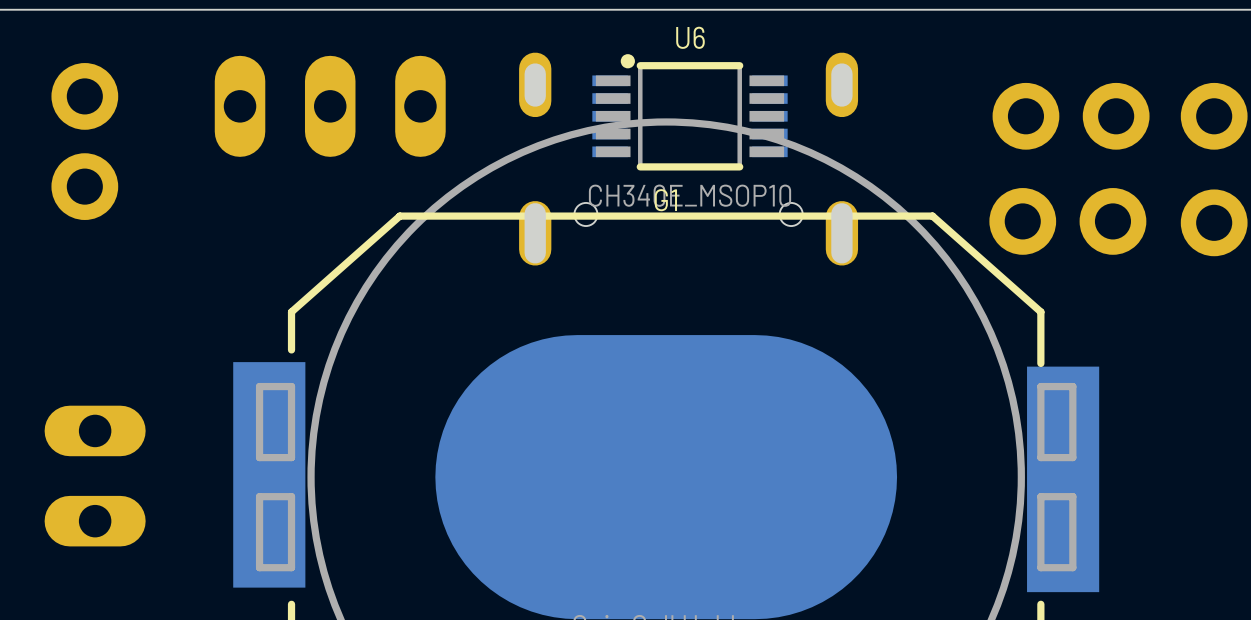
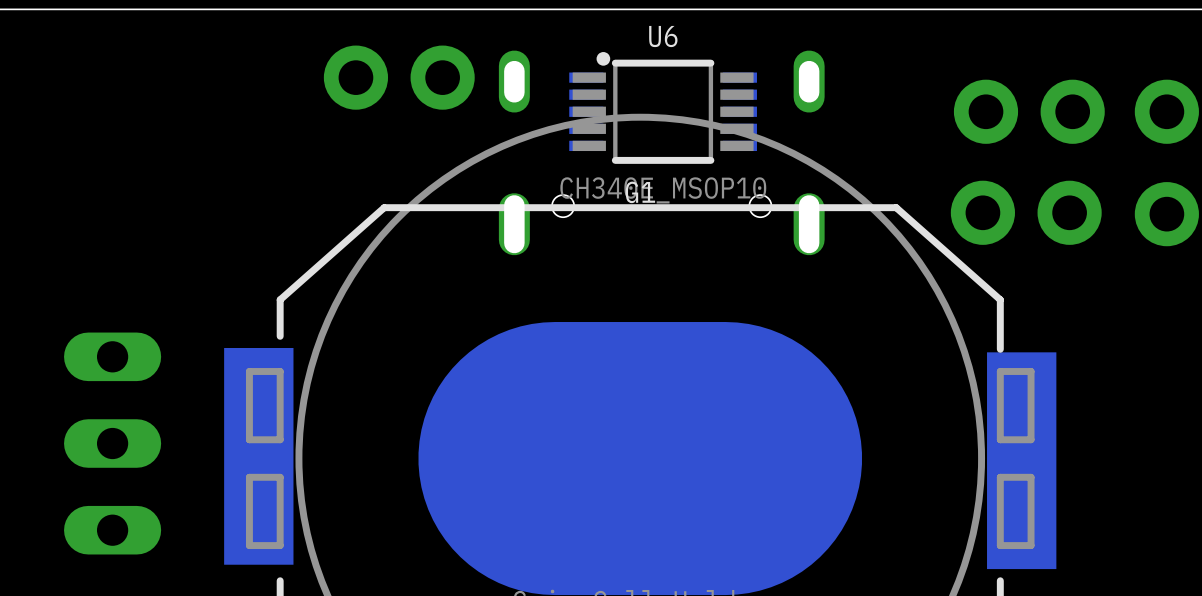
part: (330, 106) -> none
part rotation: 0° (84, 141) -> 90° clockwise (399, 77)
part position: (84, 141) -> (399, 77)
part footprint: [44, 405, 146, 547] -> [64, 332, 162, 555]

